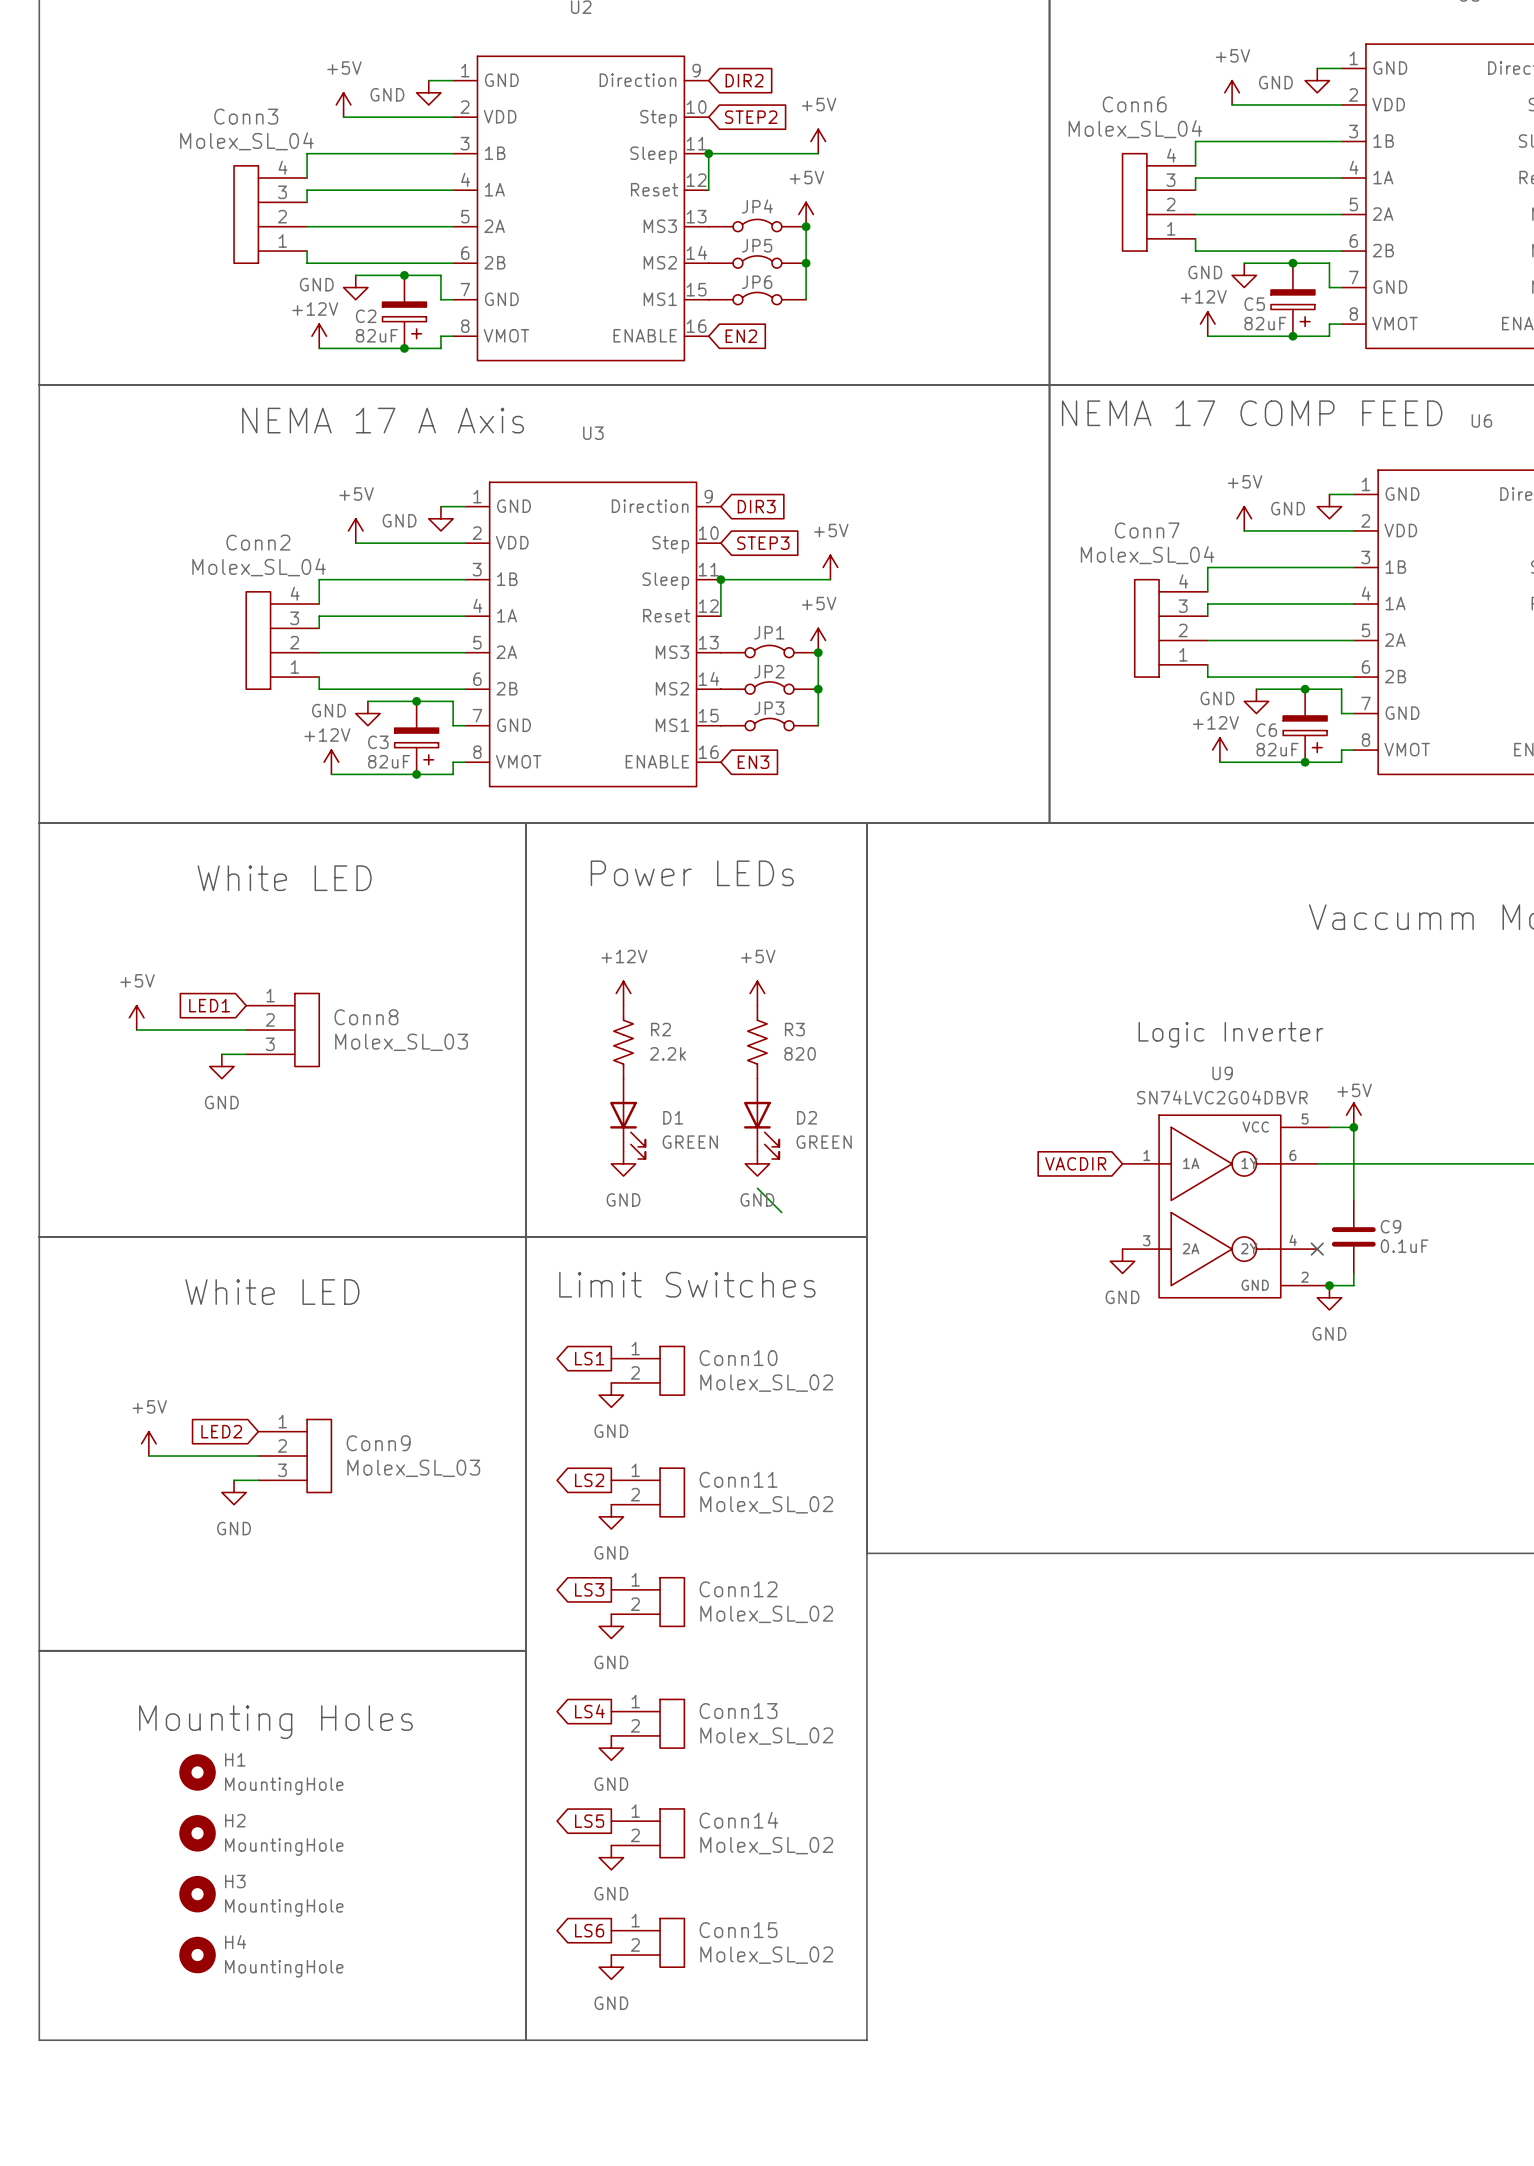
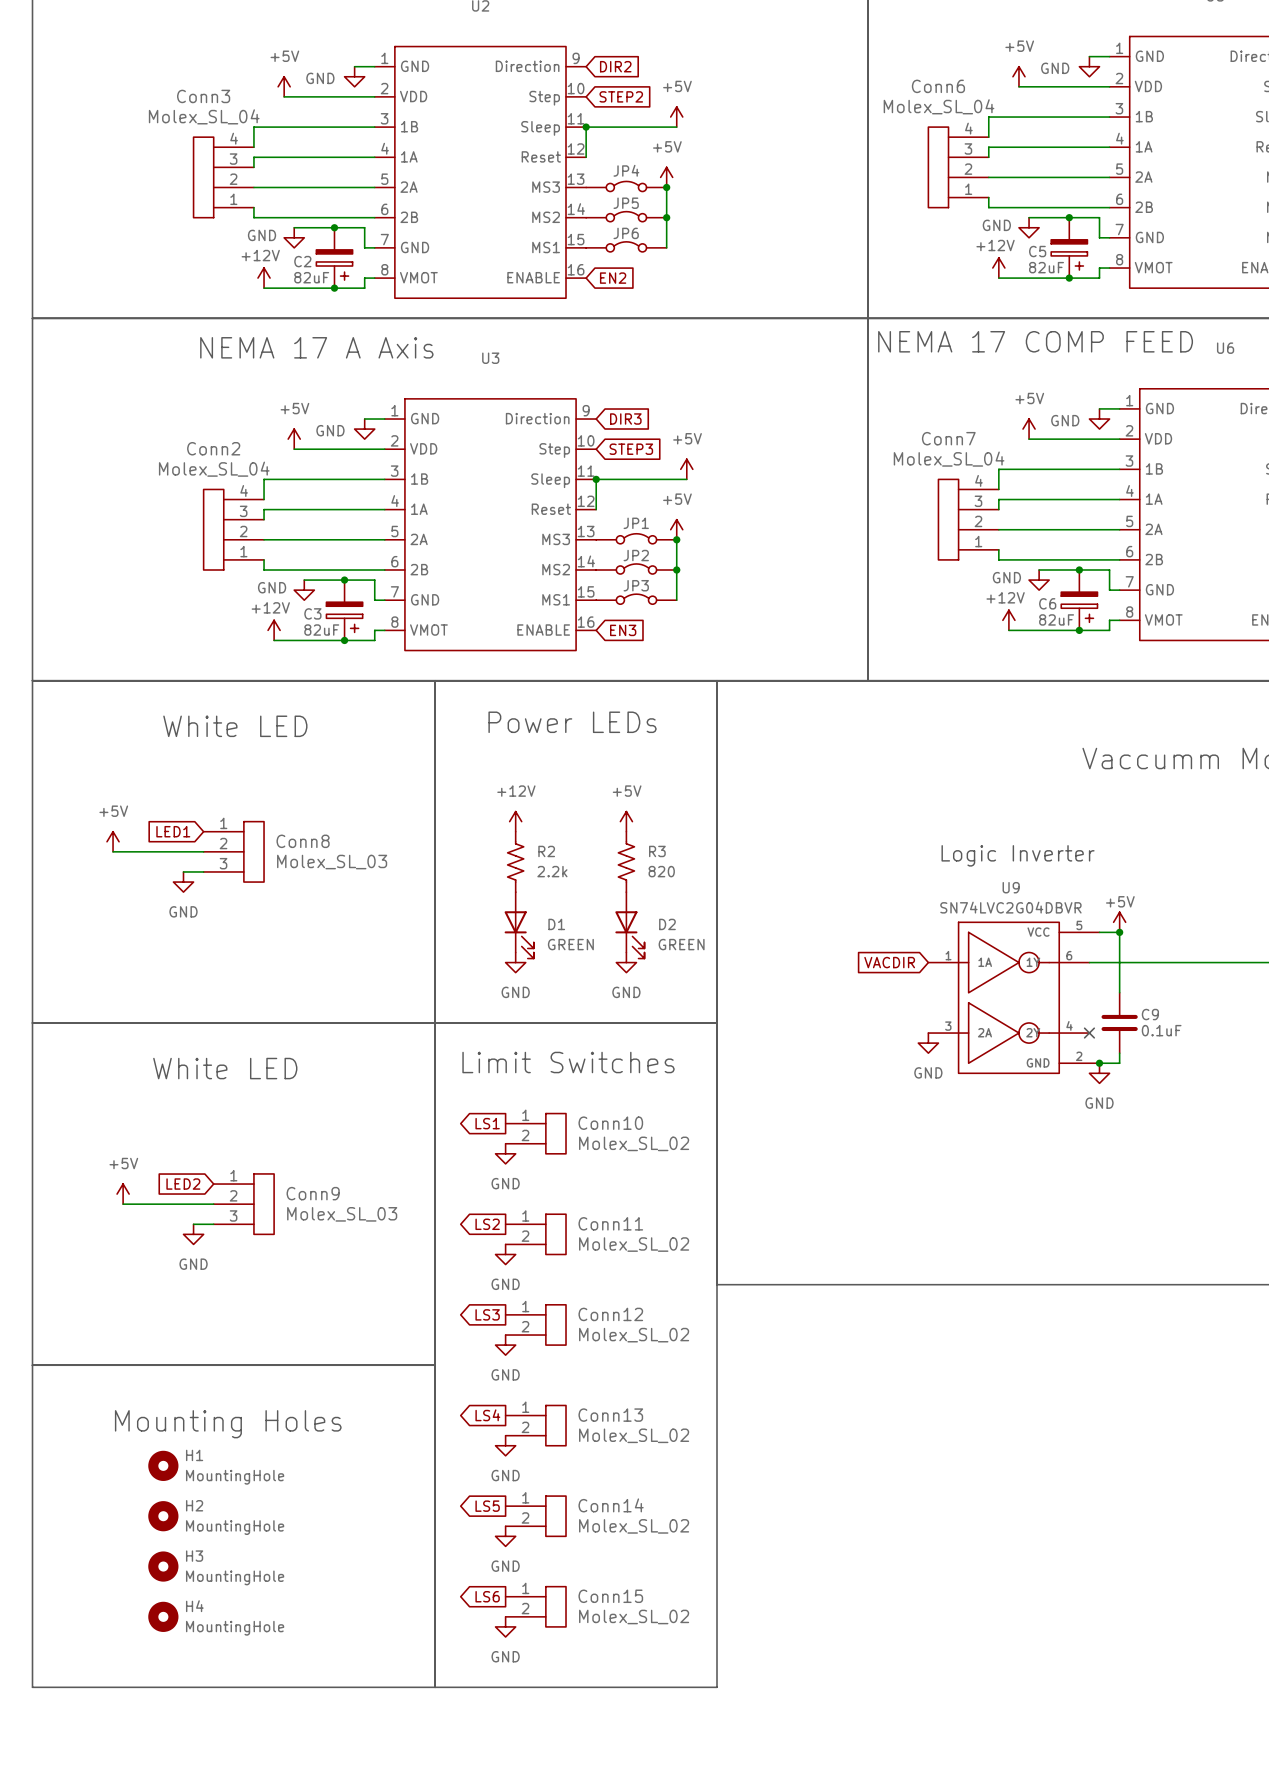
wire: (757, 1188) (781, 1212) -> none

